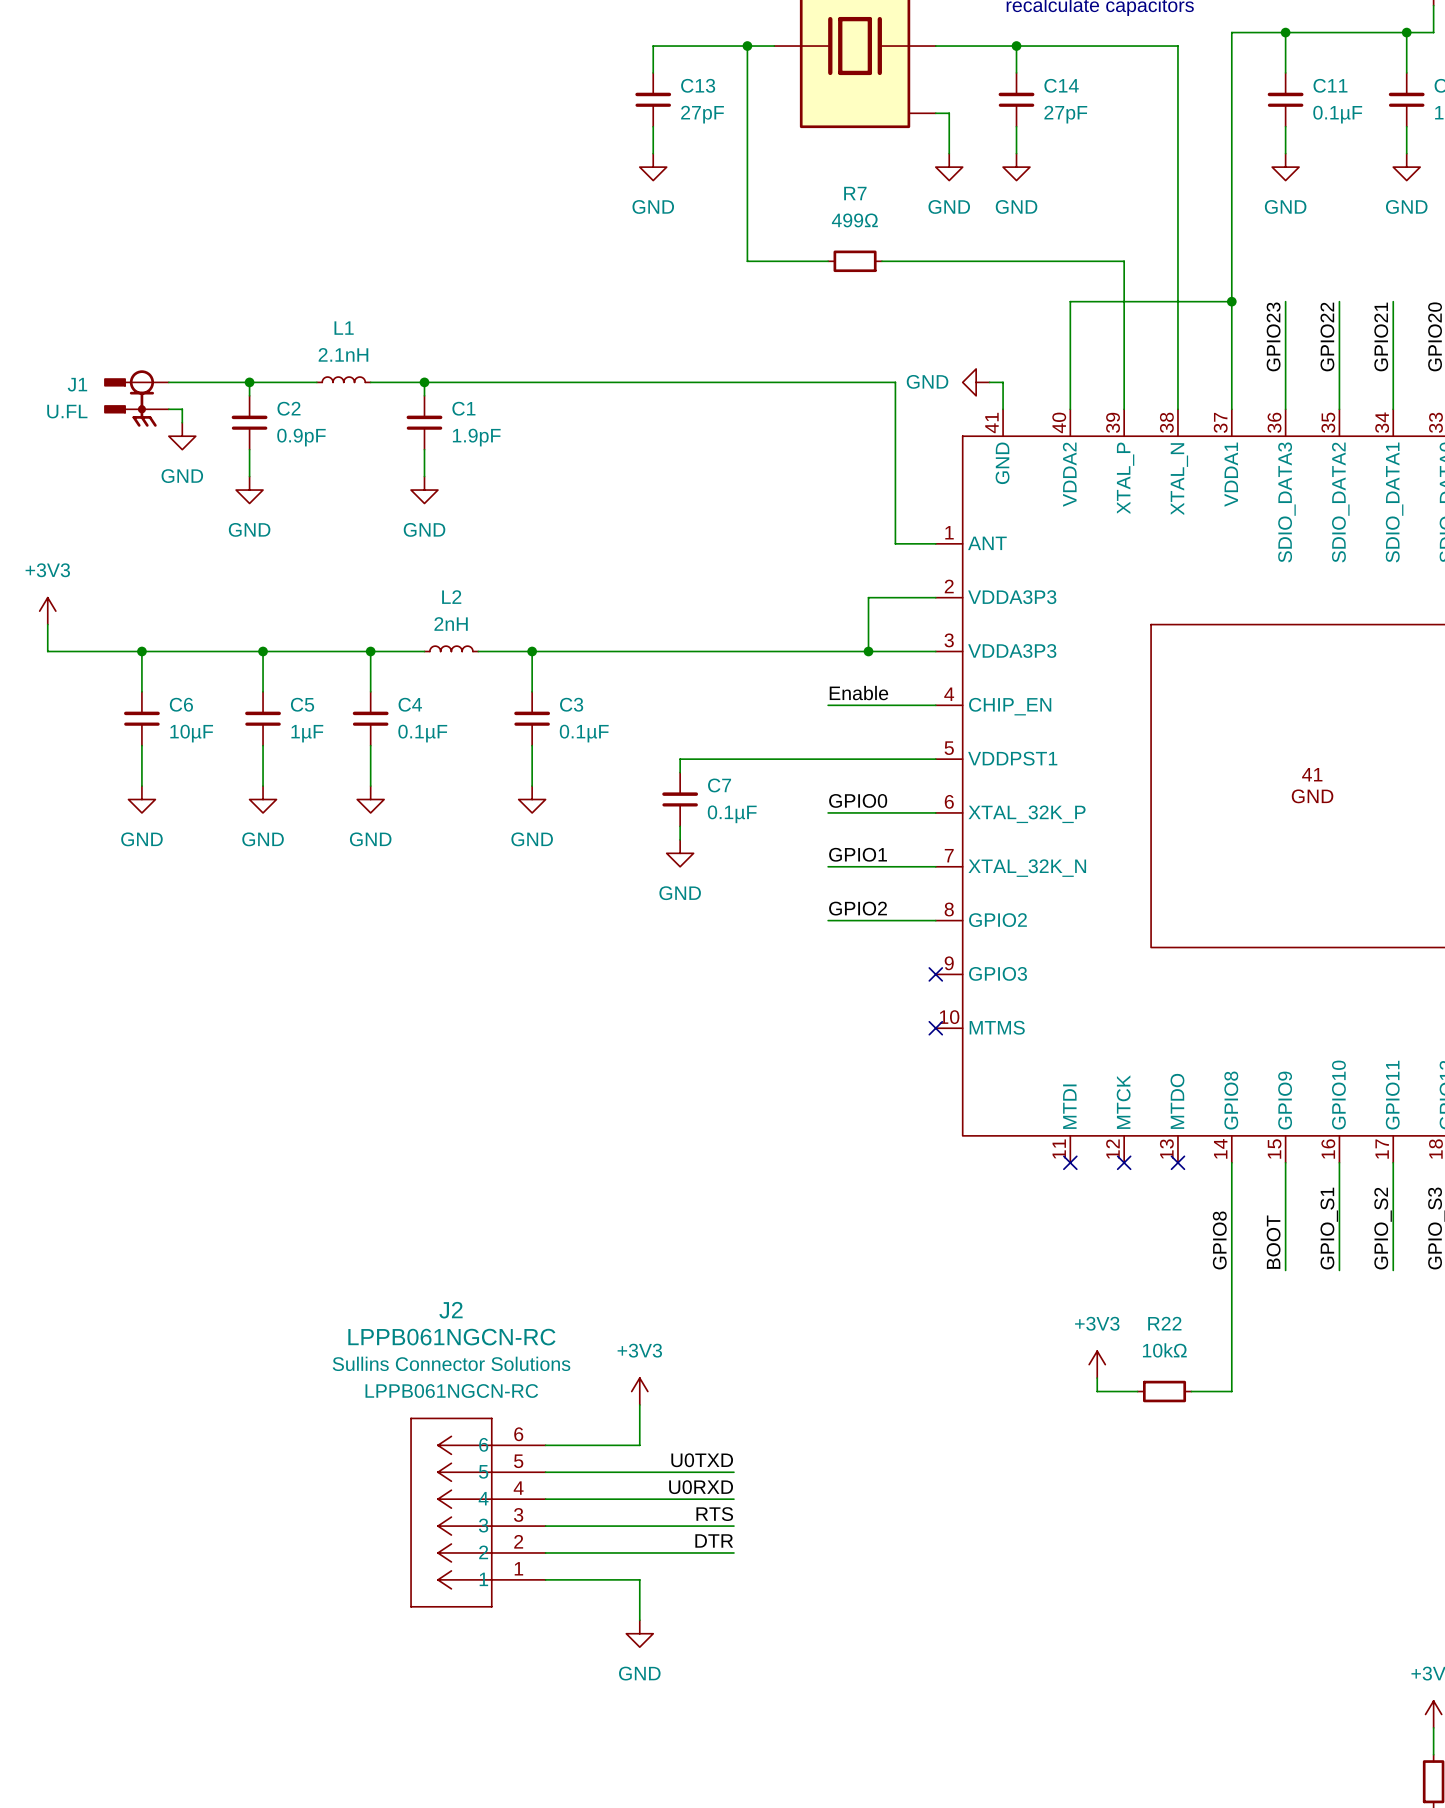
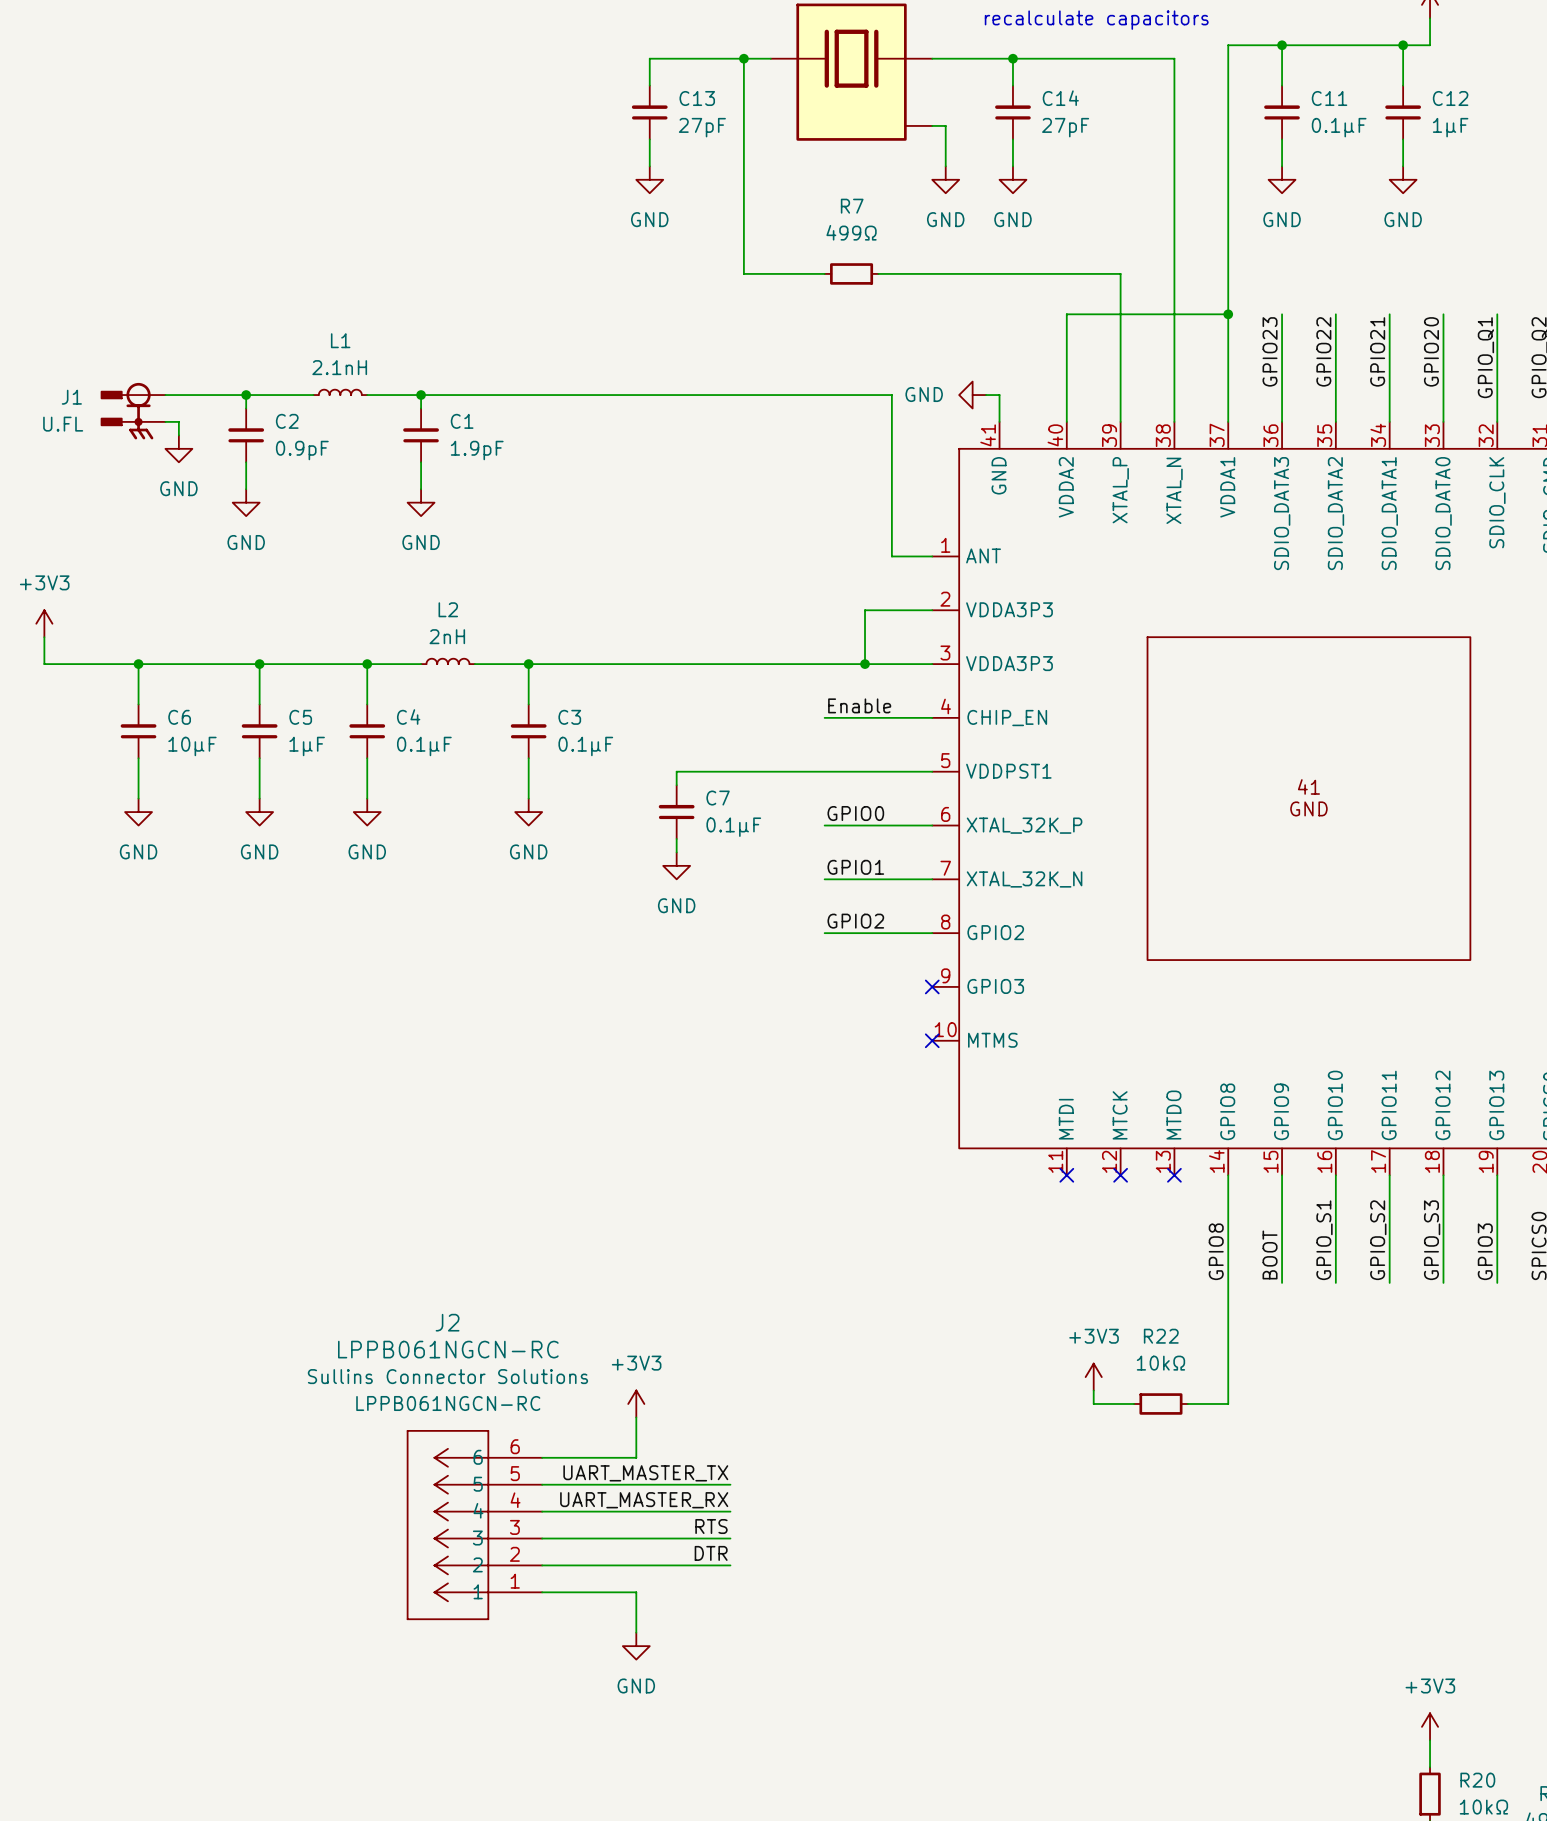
label: U0TXD (702, 1460) -> UART_MASTER_TX (645, 1473)
label: U0RXD (701, 1487) -> UART_MASTER_RX (644, 1500)

